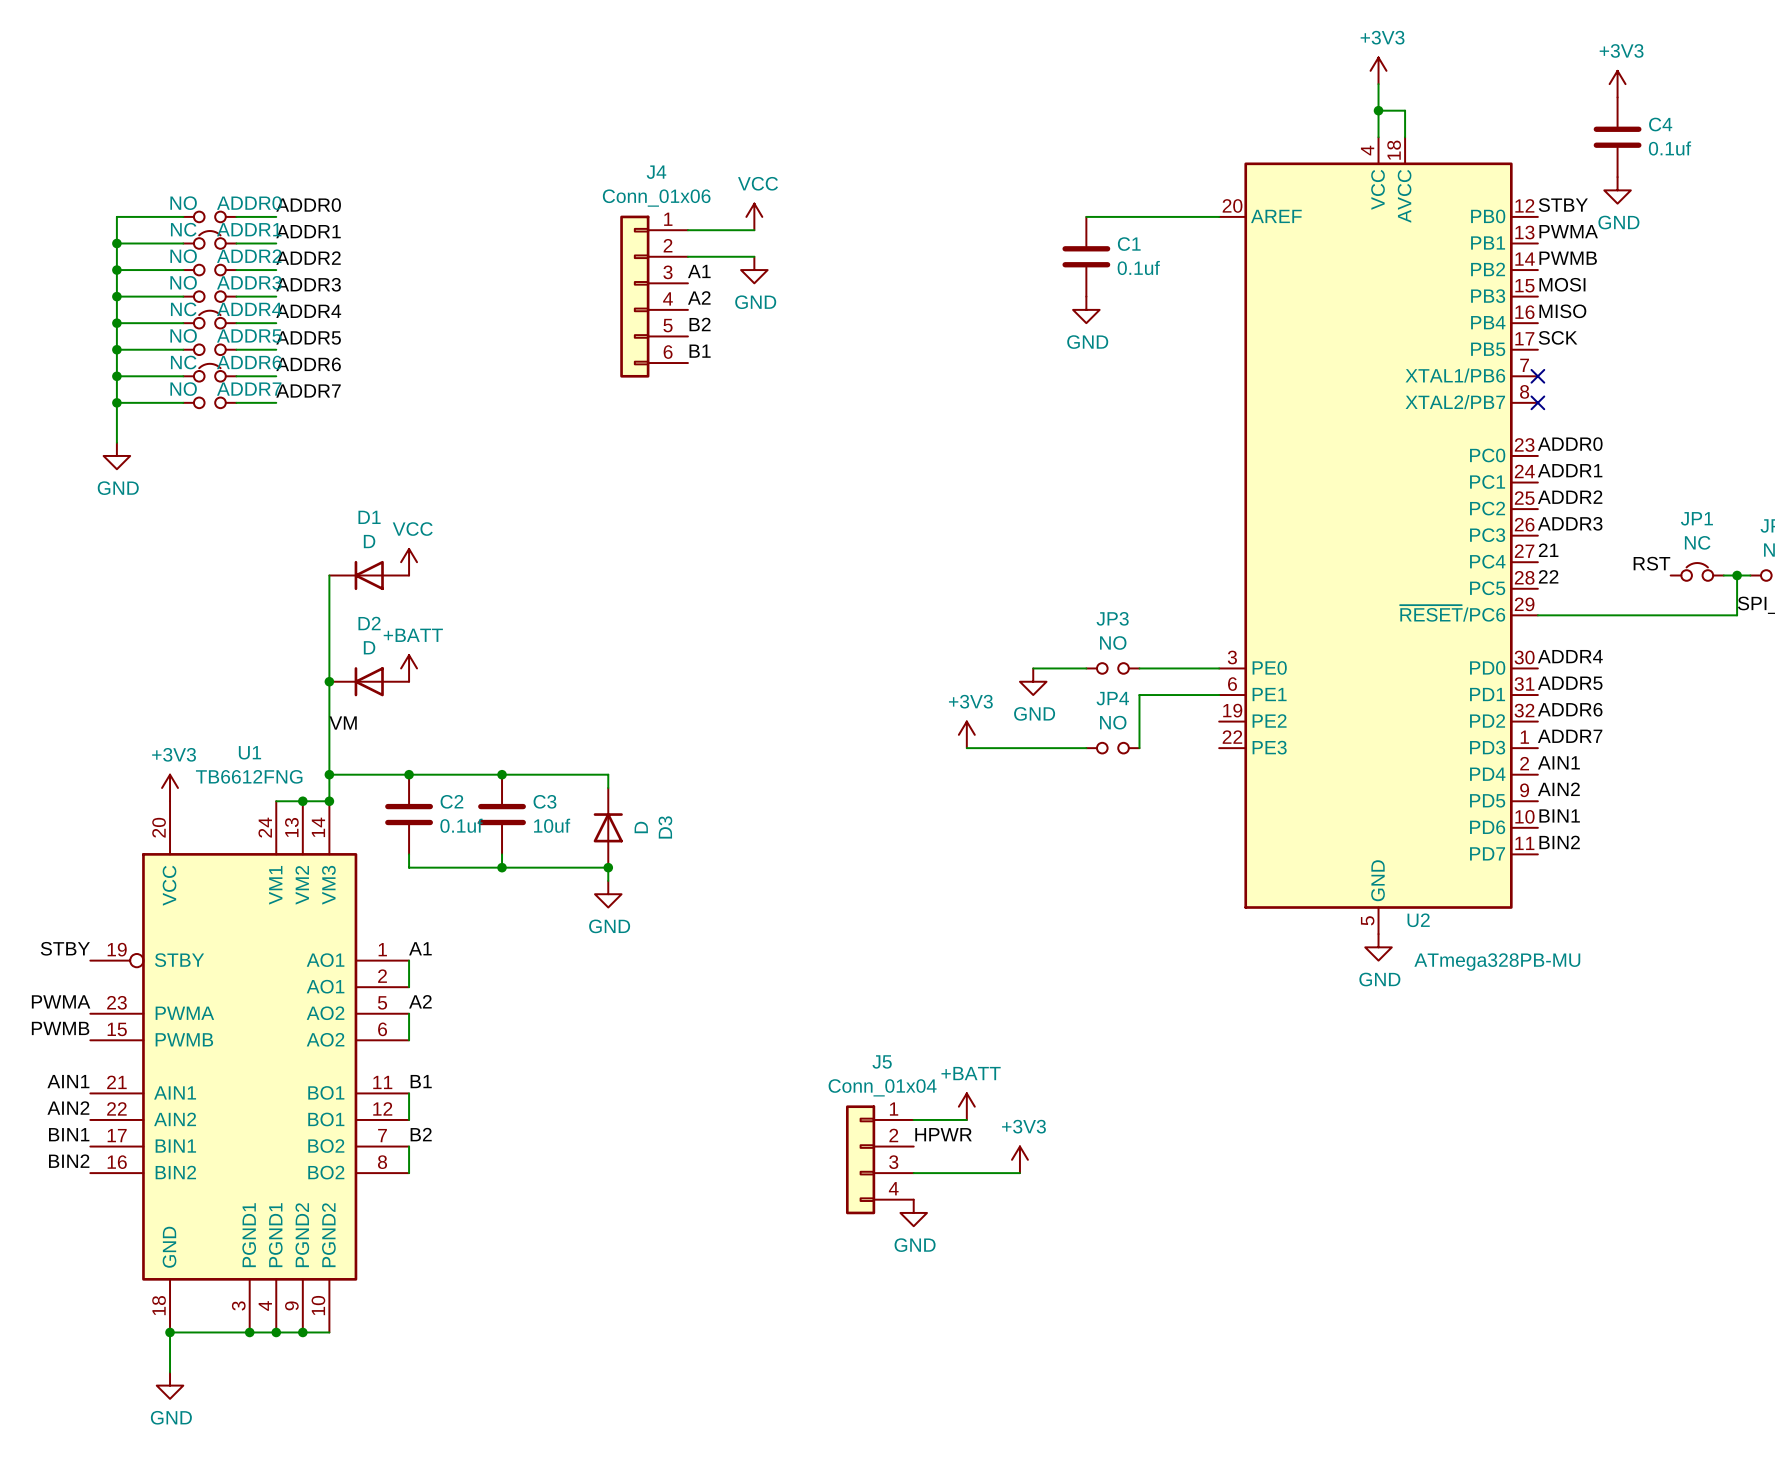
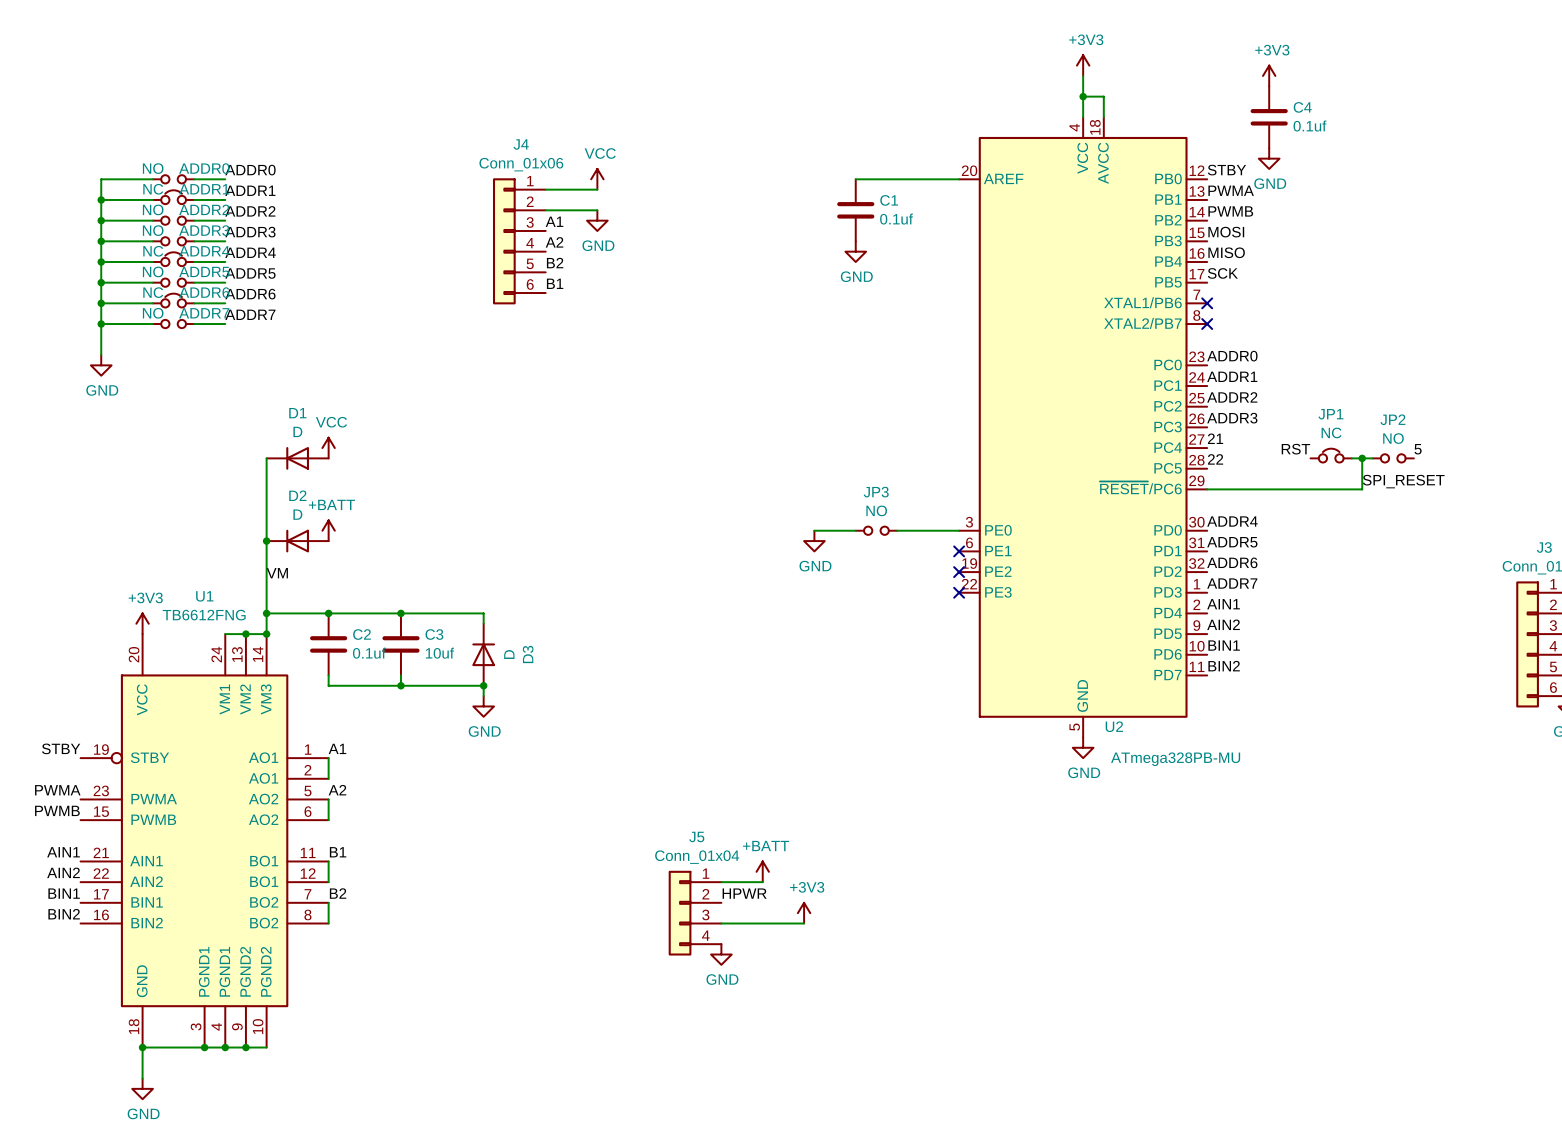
wire: (1219, 695) (1139, 695) (1139, 748) -> none
no-connect mark: none -> (959, 551)
no-connect mark: none -> (959, 572)
power symbol: +3V3 (966, 734) -> none
wire: (966, 748) (1086, 748) -> none
JP4: NO (1112, 748) -> none
no-connect mark: none -> (959, 592)

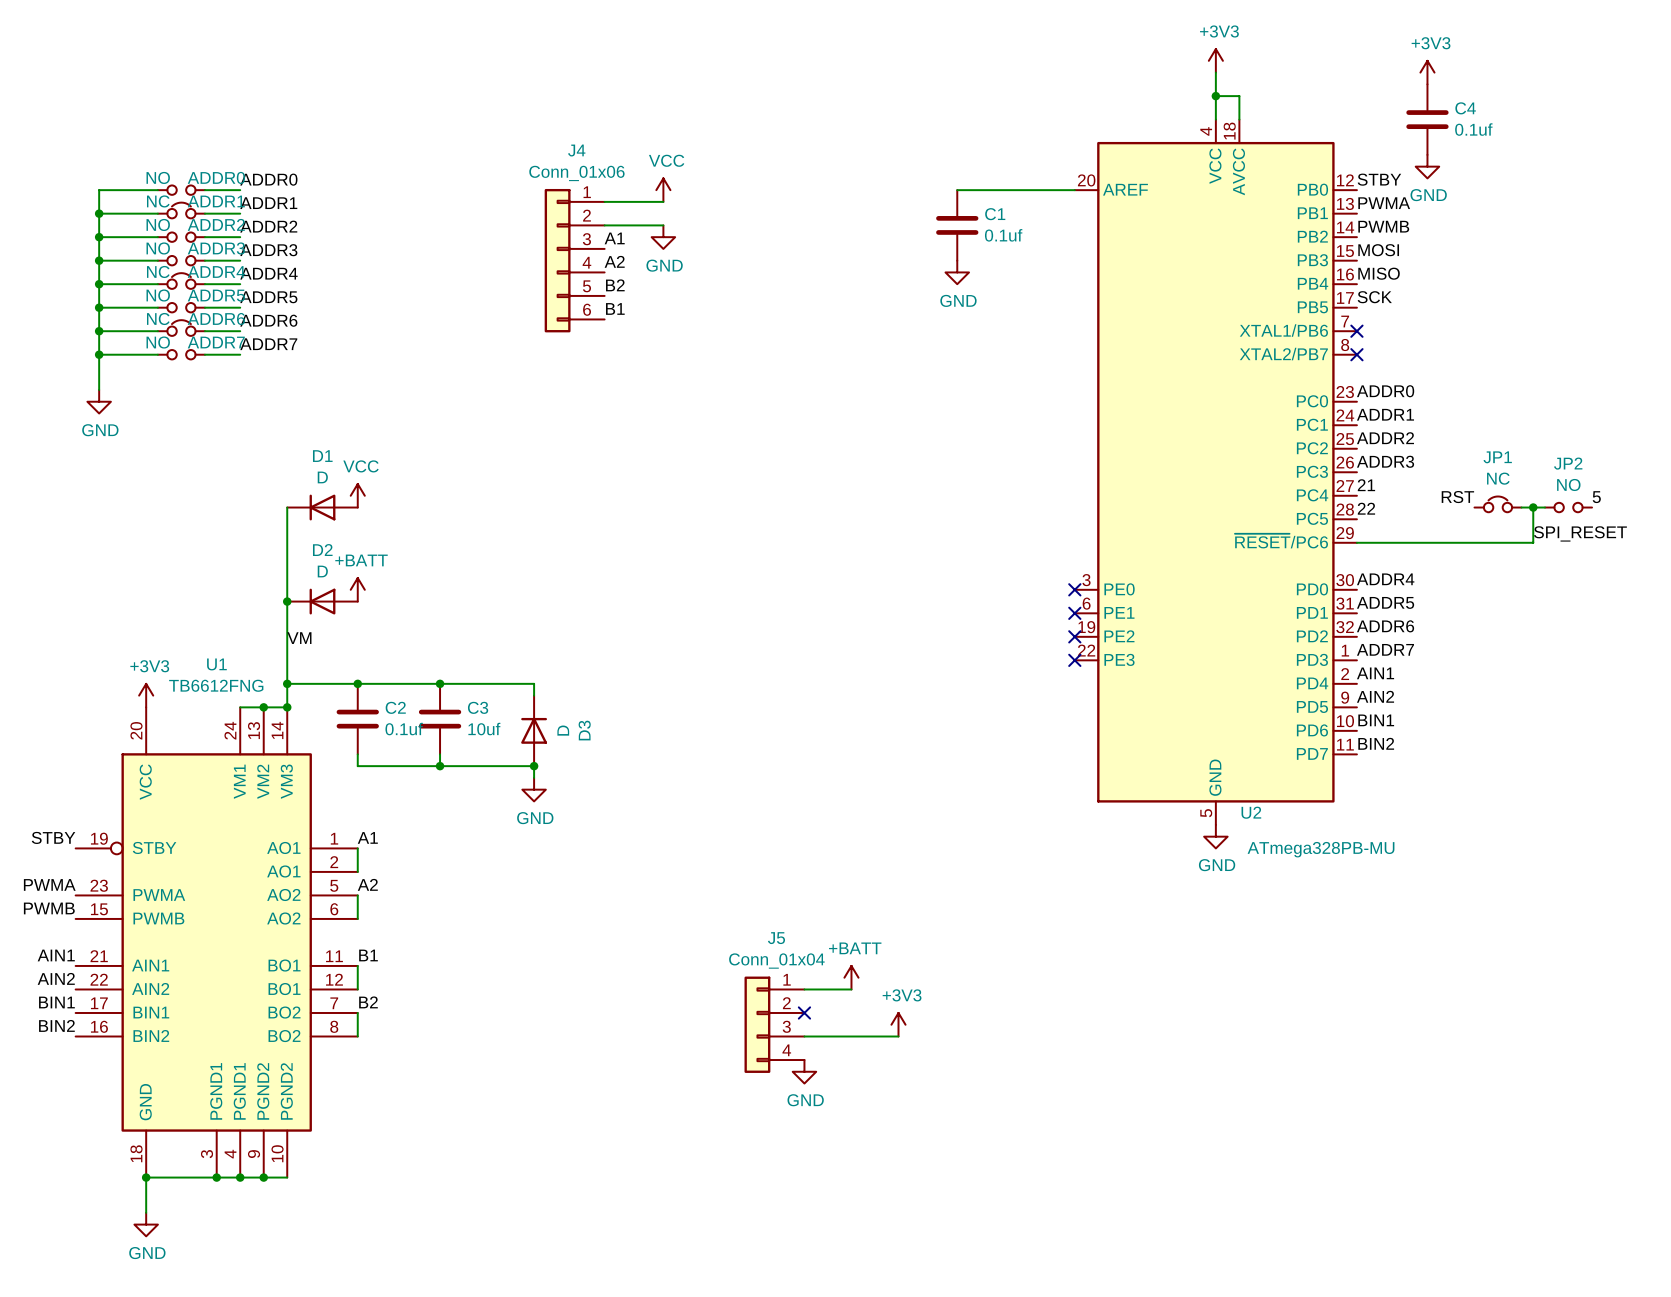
wire: (814, 530) (855, 530) -> none
JP3: NO (876, 530) -> none
wire: (897, 530) (959, 530) -> none
no-connect mark: none -> (1074, 589)
power symbol: GND (814, 541) -> none
label: HPWR (744, 893) -> none
no-connect mark: none -> (804, 1012)

